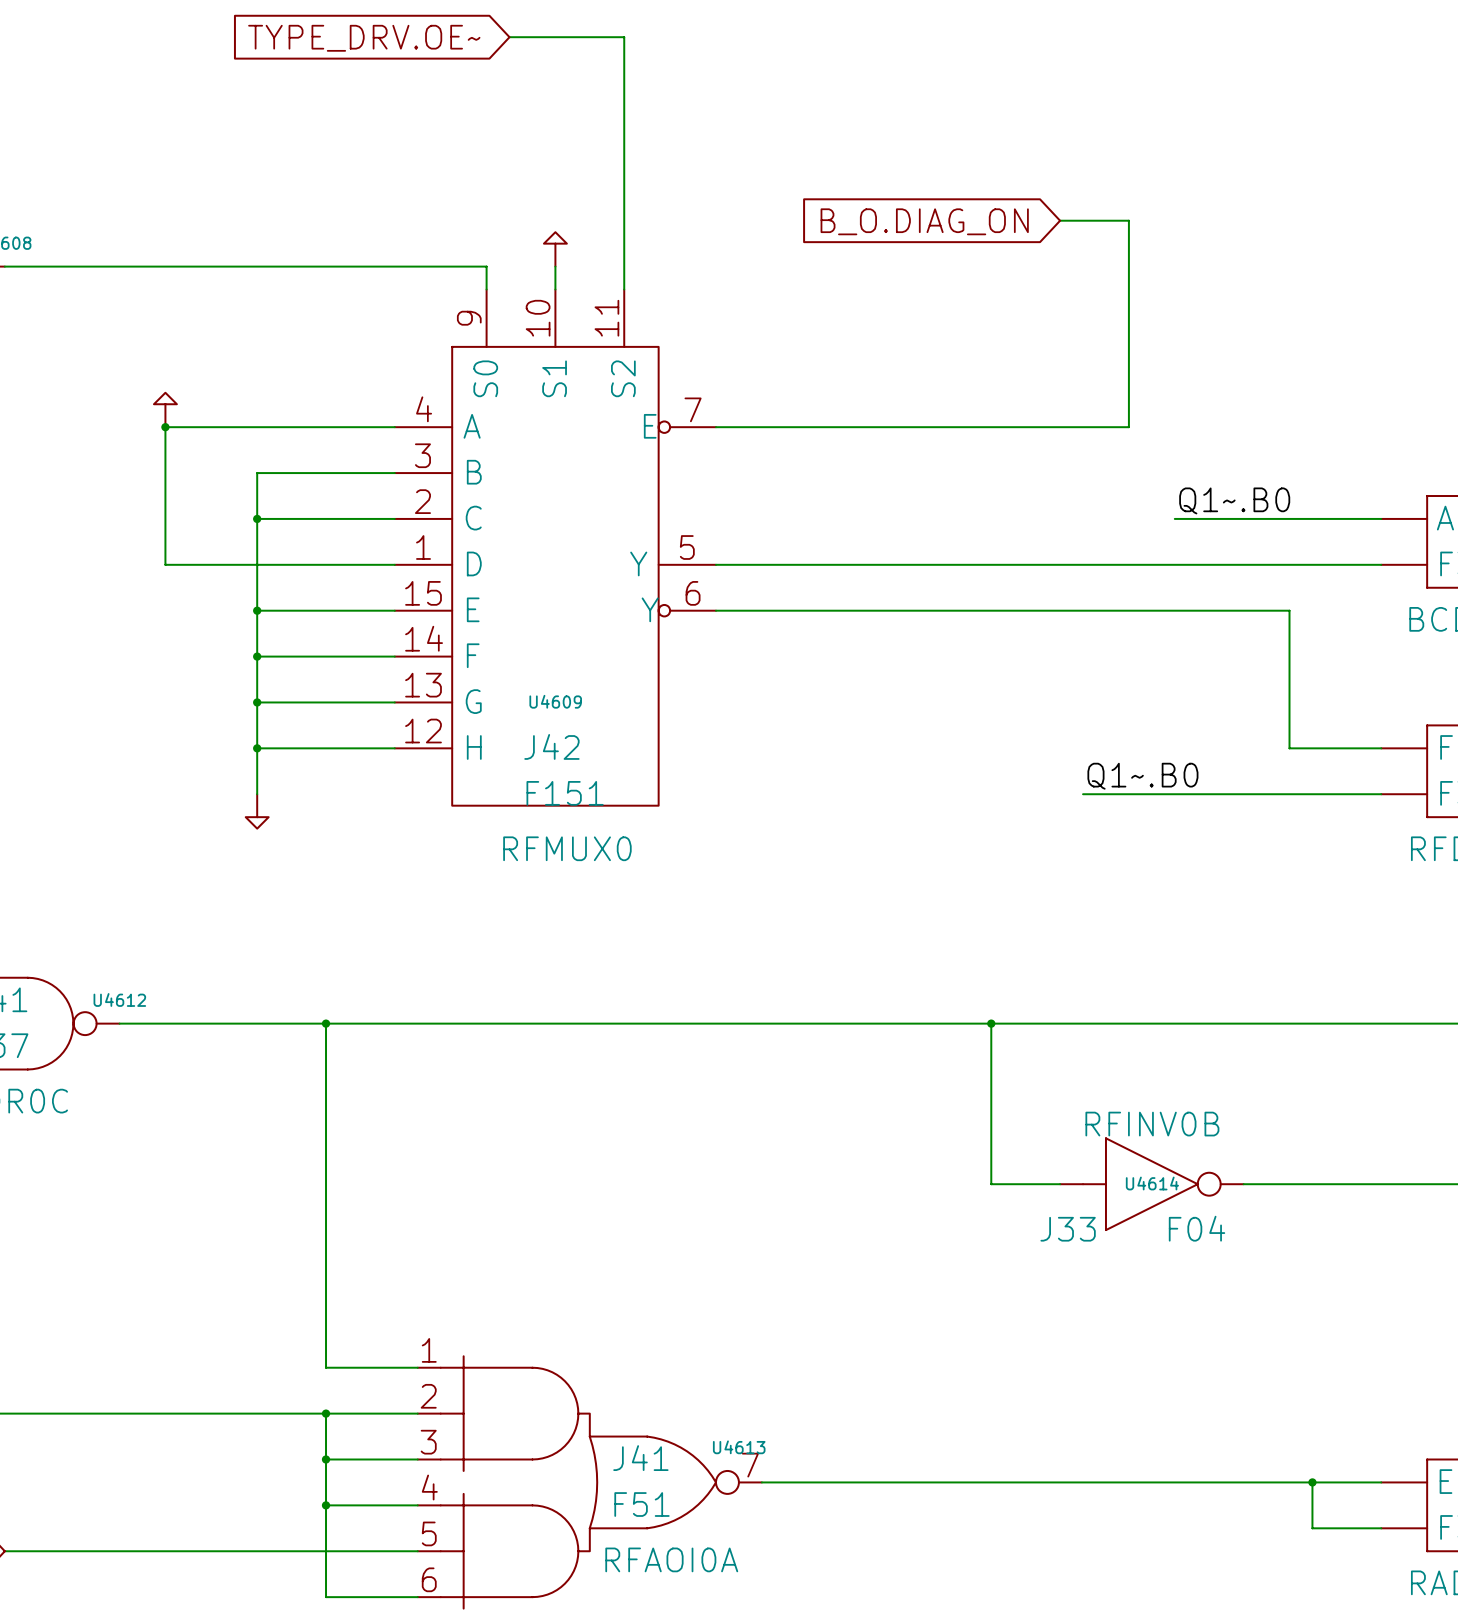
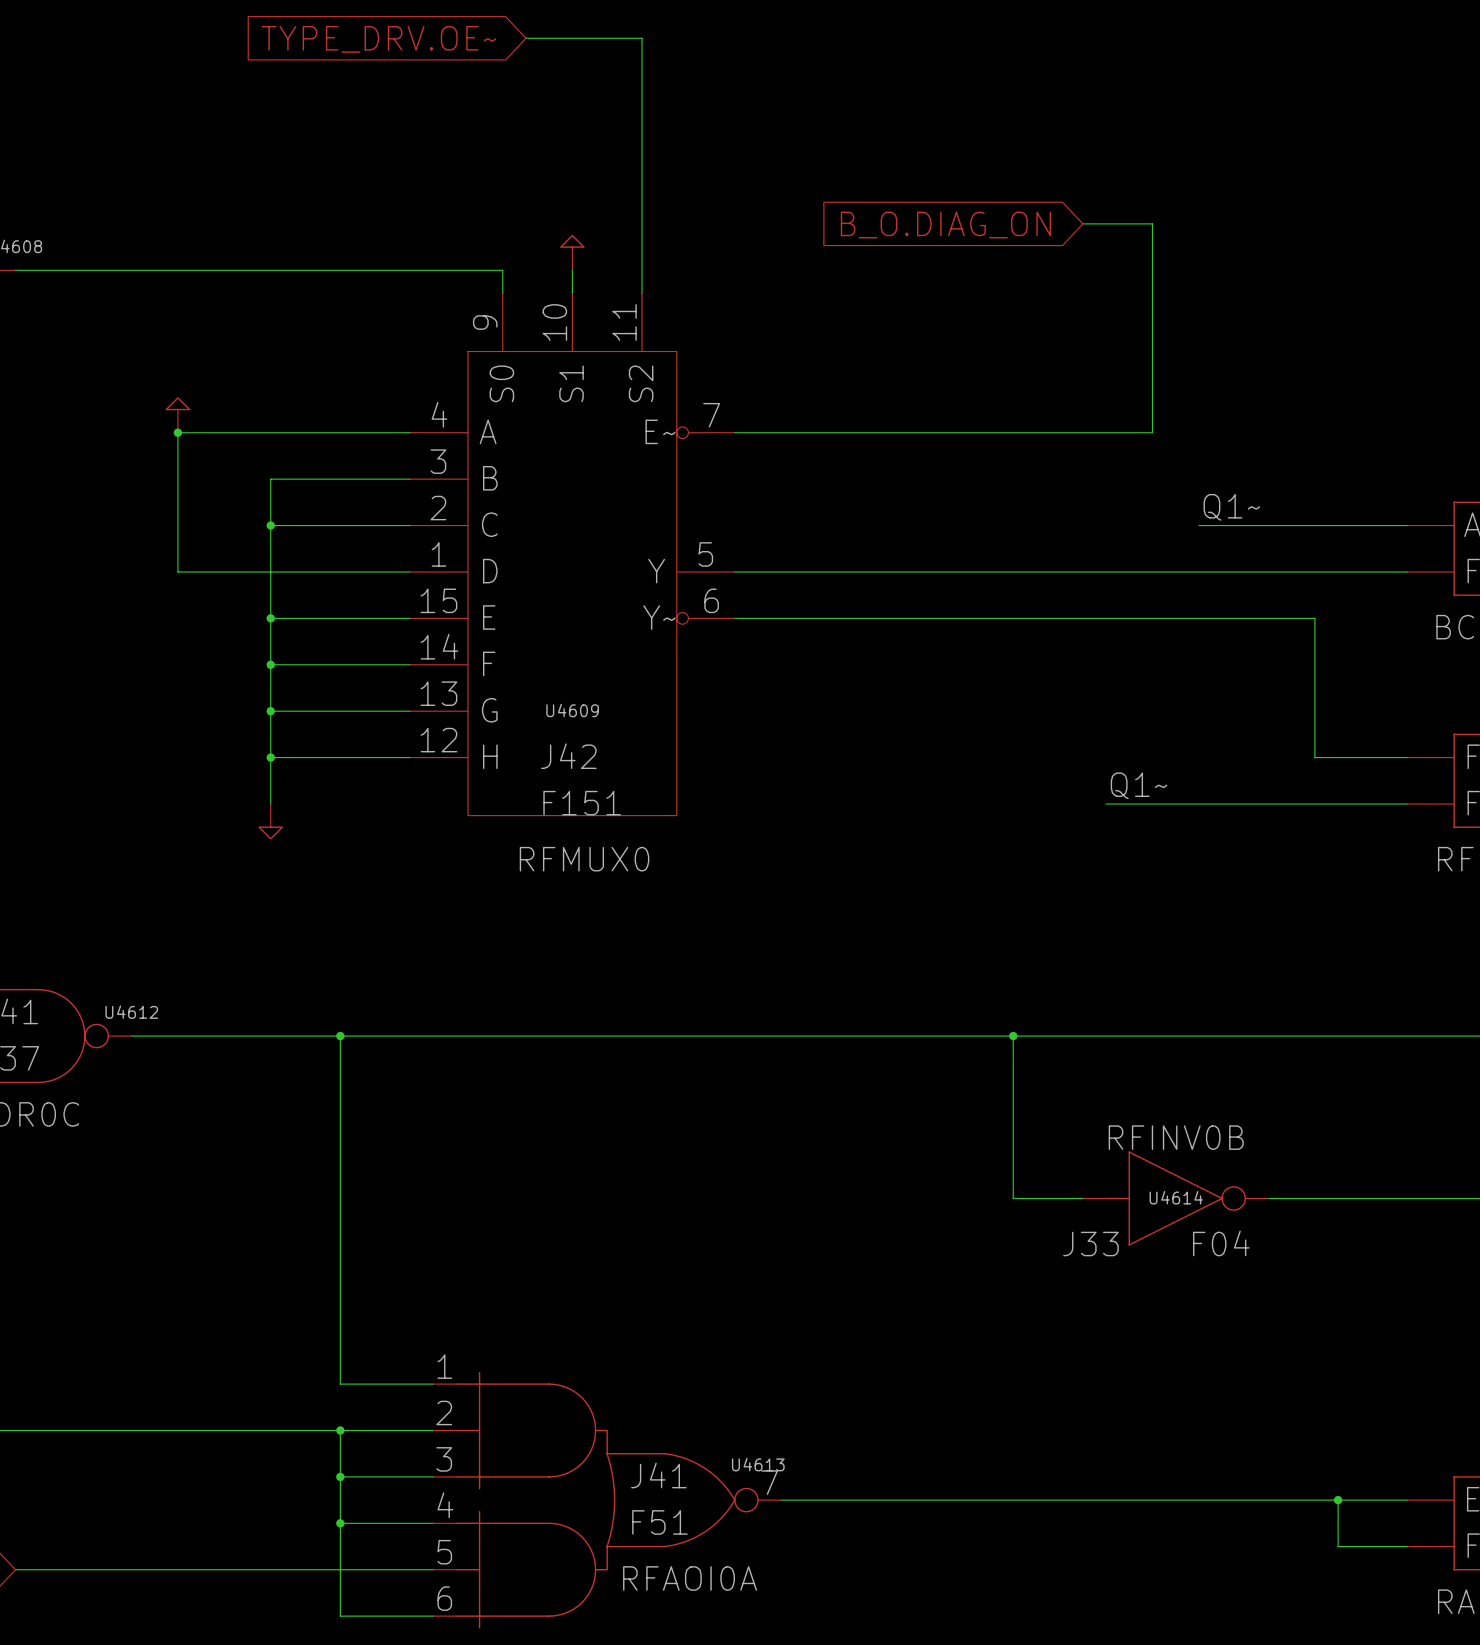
U4609 pin name: E (650, 426) -> E~ (660, 431)
label: Q1~.B0 (1234, 500) -> Q1~ (1231, 507)
U4609 pin name: Y (650, 609) -> Y~ (659, 617)
label: Q1~.B0 (1142, 776) -> Q1~ (1139, 785)

